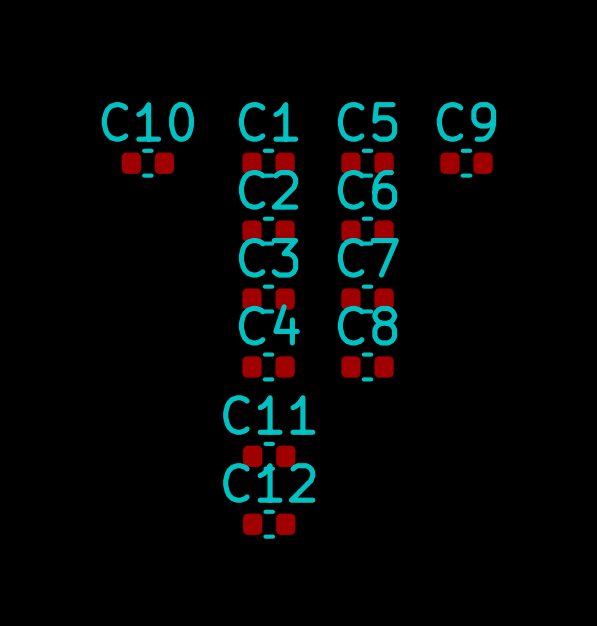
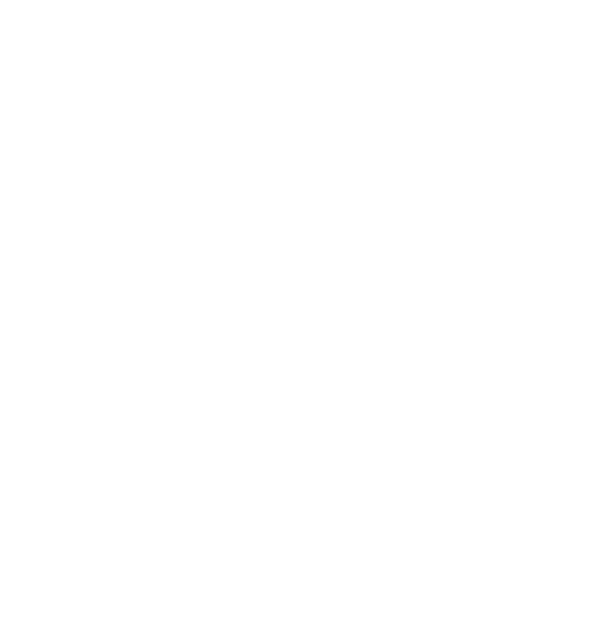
C10: (147, 163) -> none
C1: (268, 163) -> none
C5: (367, 163) -> none
C9: (466, 163) -> none
C2: (268, 231) -> none
C6: (367, 231) -> none
C3: (268, 299) -> none
C7: (367, 299) -> none
C4: (268, 366) -> none
C8: (367, 366) -> none
C11: (269, 456) -> none
C12: (269, 524) -> none

